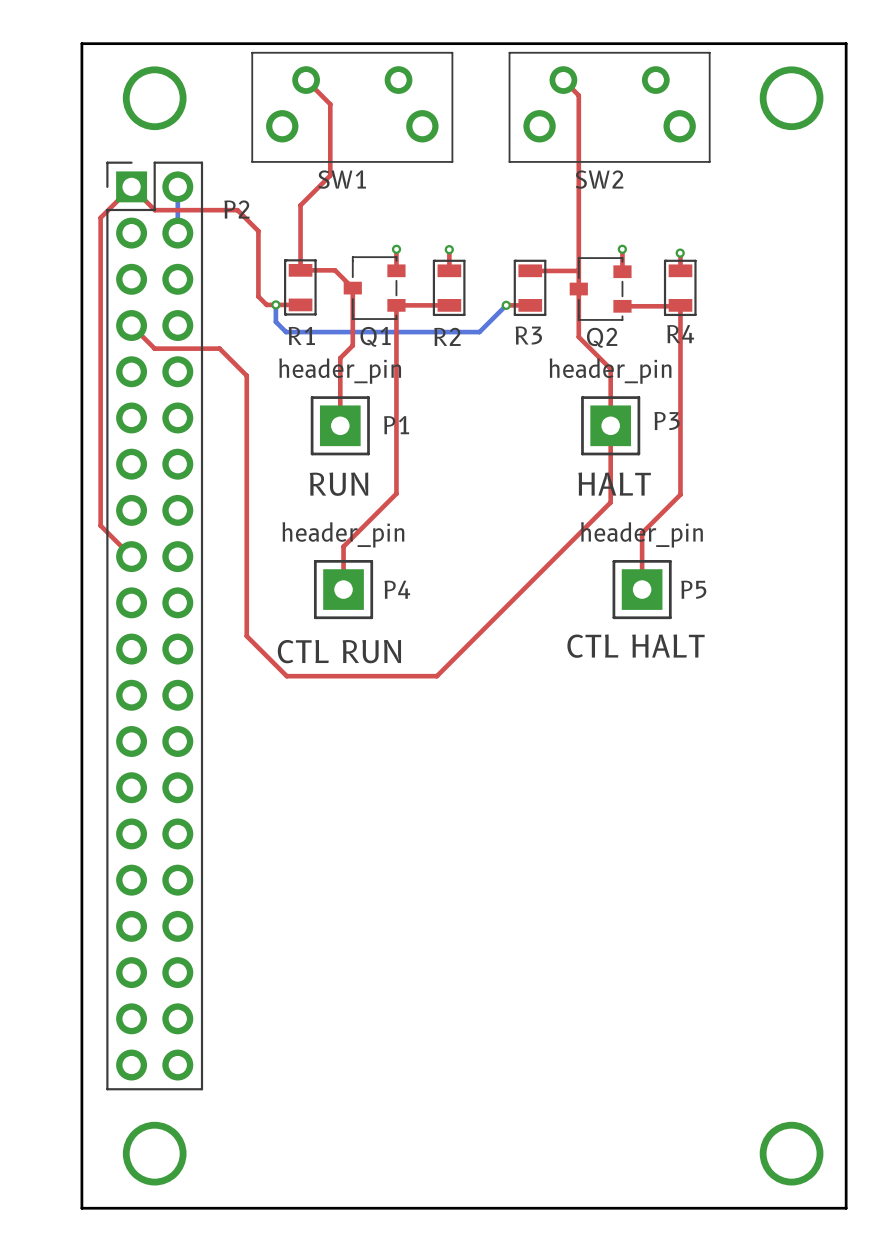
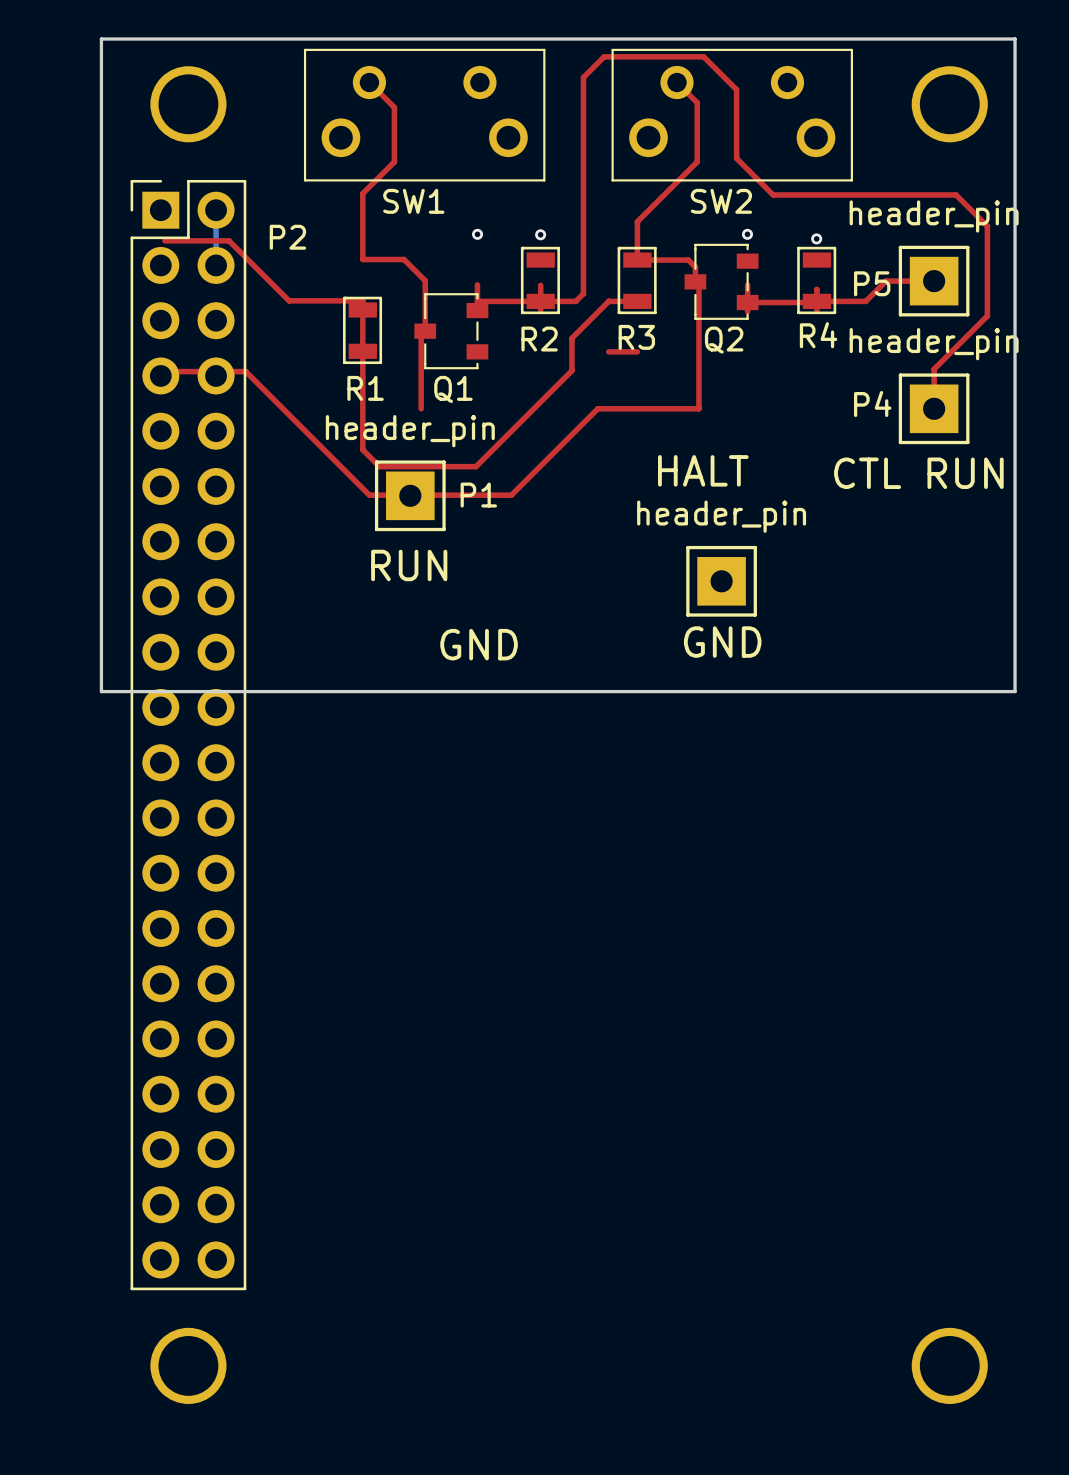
top track: (578, 95) (578, 234) -> (695, 100) (697, 102) (697, 161) (637, 221) (637, 260) (688, 260) (695, 267)
top track: (327, 100) (330, 104) (330, 175) (300, 205) -> (394, 107) (394, 161) (362, 193) (362, 232)
via: none -> (477, 234)
via: none -> (540, 234)
via: none -> (747, 234)
via: none -> (816, 238)
top track: none -> (164, 240) (229, 240) (289, 300) (362, 300)
top track: (300, 228) (300, 262) -> (362, 259) (404, 259) (425, 280) (425, 328) (421, 332) (421, 408)
top track: (578, 246) (578, 337) (610, 369) (610, 502) (436, 676) (286, 676) (246, 636) (246, 375) (219, 348) (154, 348) (131, 325) -> (695, 281) (698, 285) (698, 408) (597, 408) (511, 495) (369, 495) (245, 371) (164, 371)
top track: none -> (934, 281) (886, 281) (865, 301) (747, 302)
via: (396, 249) -> none
via: (449, 249) -> none
via: (622, 249) -> none
via: (680, 253) -> none
top track: none -> (477, 301) (575, 301) (583, 293) (583, 77) (604, 56) (703, 56) (736, 89) (736, 158) (773, 194) (956, 194) (987, 226) (987, 315) (934, 369) (934, 408)
top track: (300, 270) (335, 270) (352, 288) (352, 345) (340, 358) (340, 425) -> (362, 309) (362, 449) (379, 466) (476, 466) (571, 370) (571, 338) (608, 301) (637, 301)
top track: (530, 270) (578, 270) -> none
R2 position: (449, 287) -> (540, 280)
R3 position: (530, 287) -> (637, 280)
R4 position: (680, 287) -> (816, 280)
Q2 position: (600, 289) -> (721, 281)
bottom track: (275, 304) (275, 321) (286, 332) (479, 332) (506, 305) -> none
via: (275, 304) -> none
top track: (300, 304) (266, 304) (258, 296) (258, 231) (237, 210) (154, 210) (131, 186) (100, 217) (100, 525) (131, 556) -> none
top track: (449, 305) (396, 305) (396, 493) (343, 546) (343, 589) -> none
via: (506, 305) -> none
top track: (622, 306) (680, 305) (680, 494) (642, 533) (642, 589) -> none
text: none -> CTL RUN (918, 473)
P3: header_pin (610, 425) -> none
text position: HALT (614, 484) -> HALT (703, 470)
part: none -> header_pin (721, 581)
text: none -> GND (722, 642)
text: none -> GND (479, 644)
P4 footprint: [313, 559, 374, 620] -> [898, 373, 970, 445]
P5 footprint: [612, 559, 672, 620] -> [898, 245, 970, 317]
board edge: (81, 589) (81, 1208) (846, 1208) (846, 589) -> (101, 691) (1015, 691)
P4 name position: P4 (397, 589) -> P4 (872, 403)
P5 name position: P5 (693, 589) -> P5 (872, 283)
text: CTL HALT (636, 646) -> none
text: CTL RUN (339, 651) -> none

